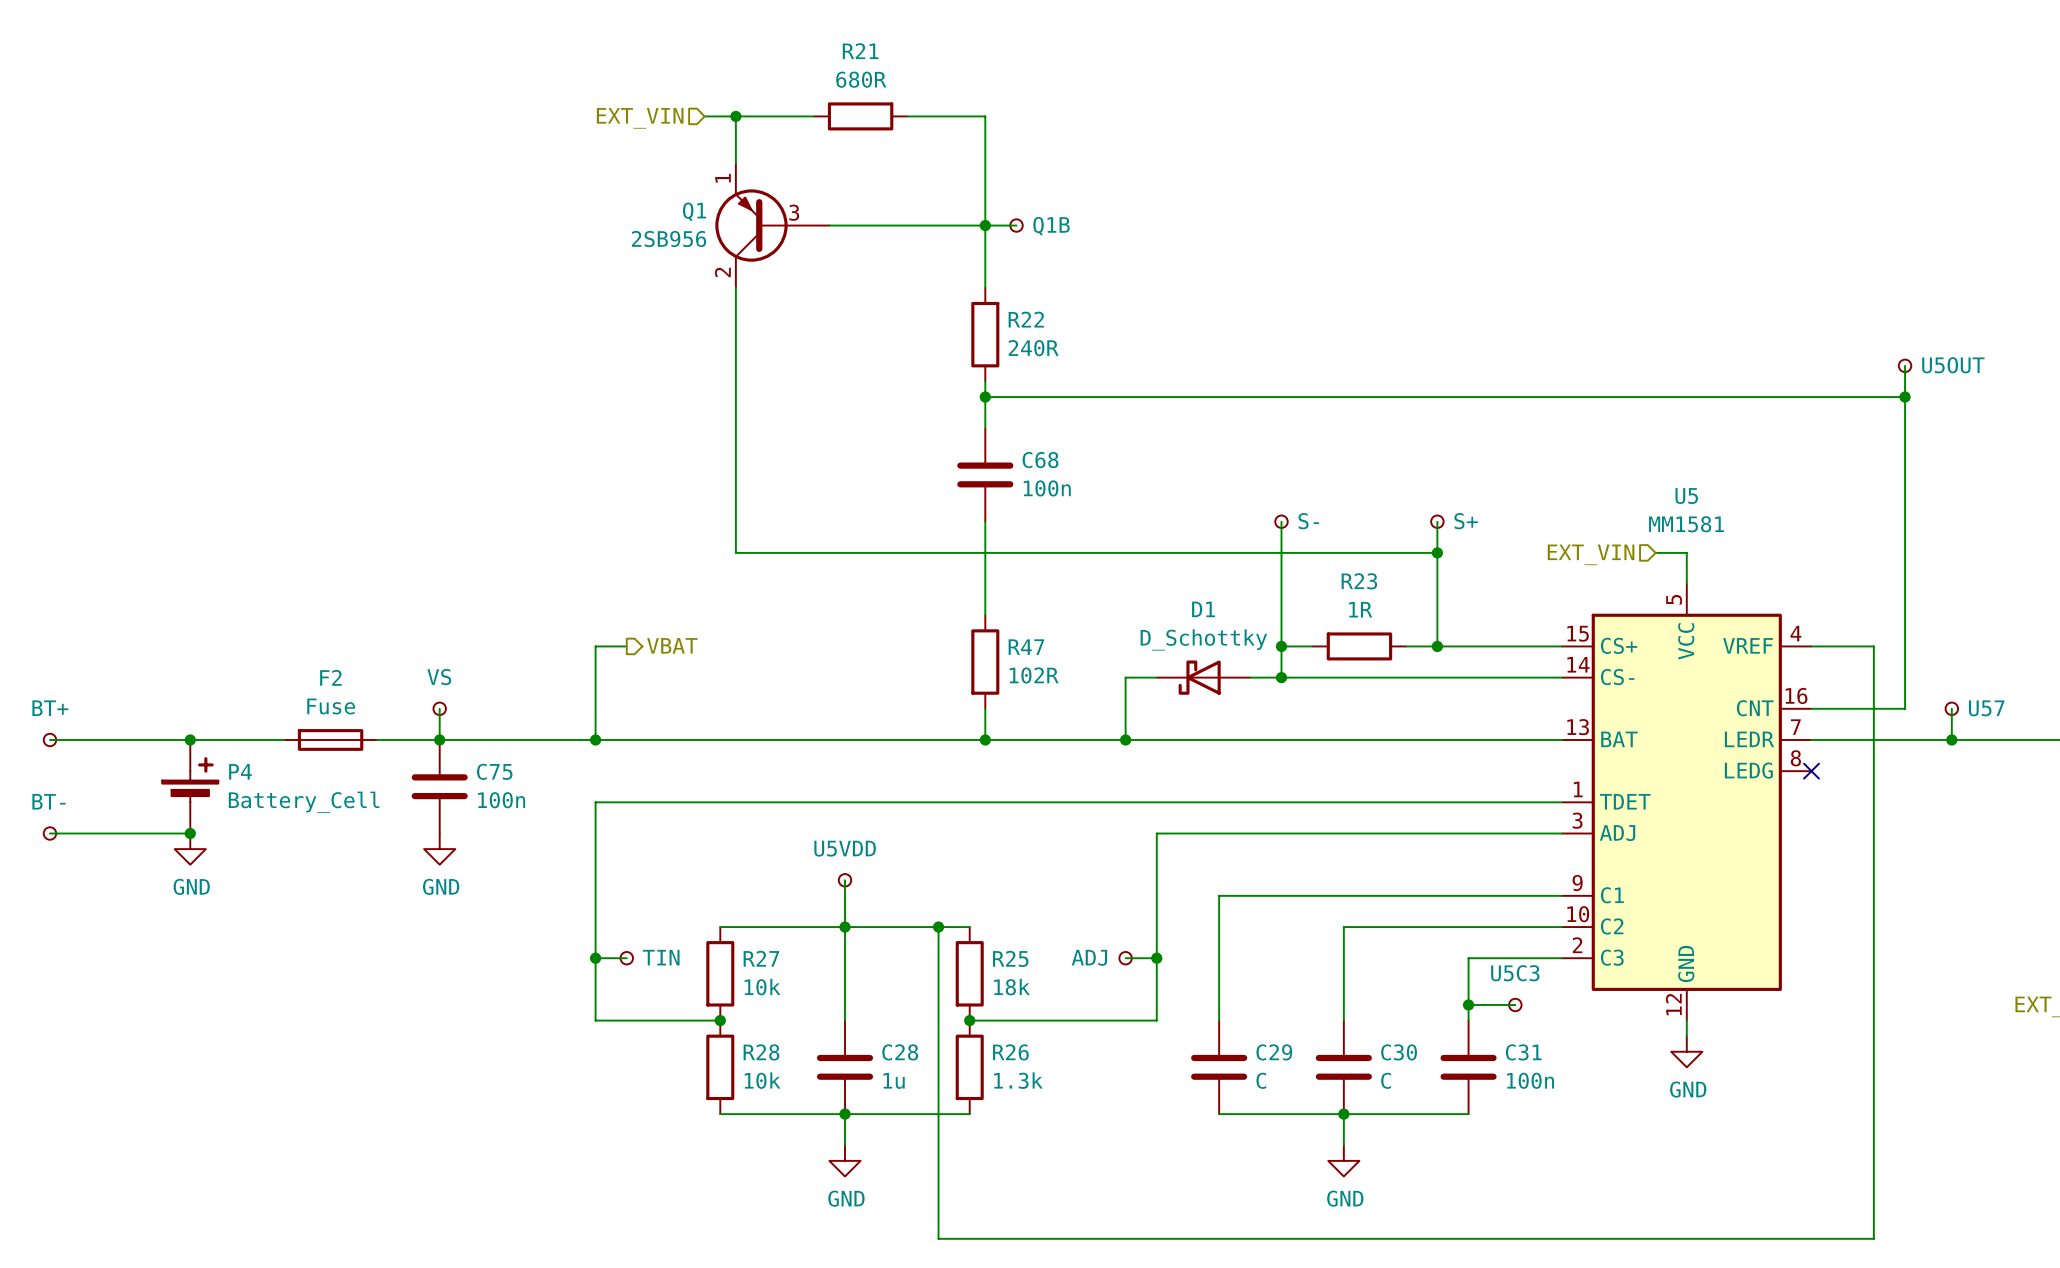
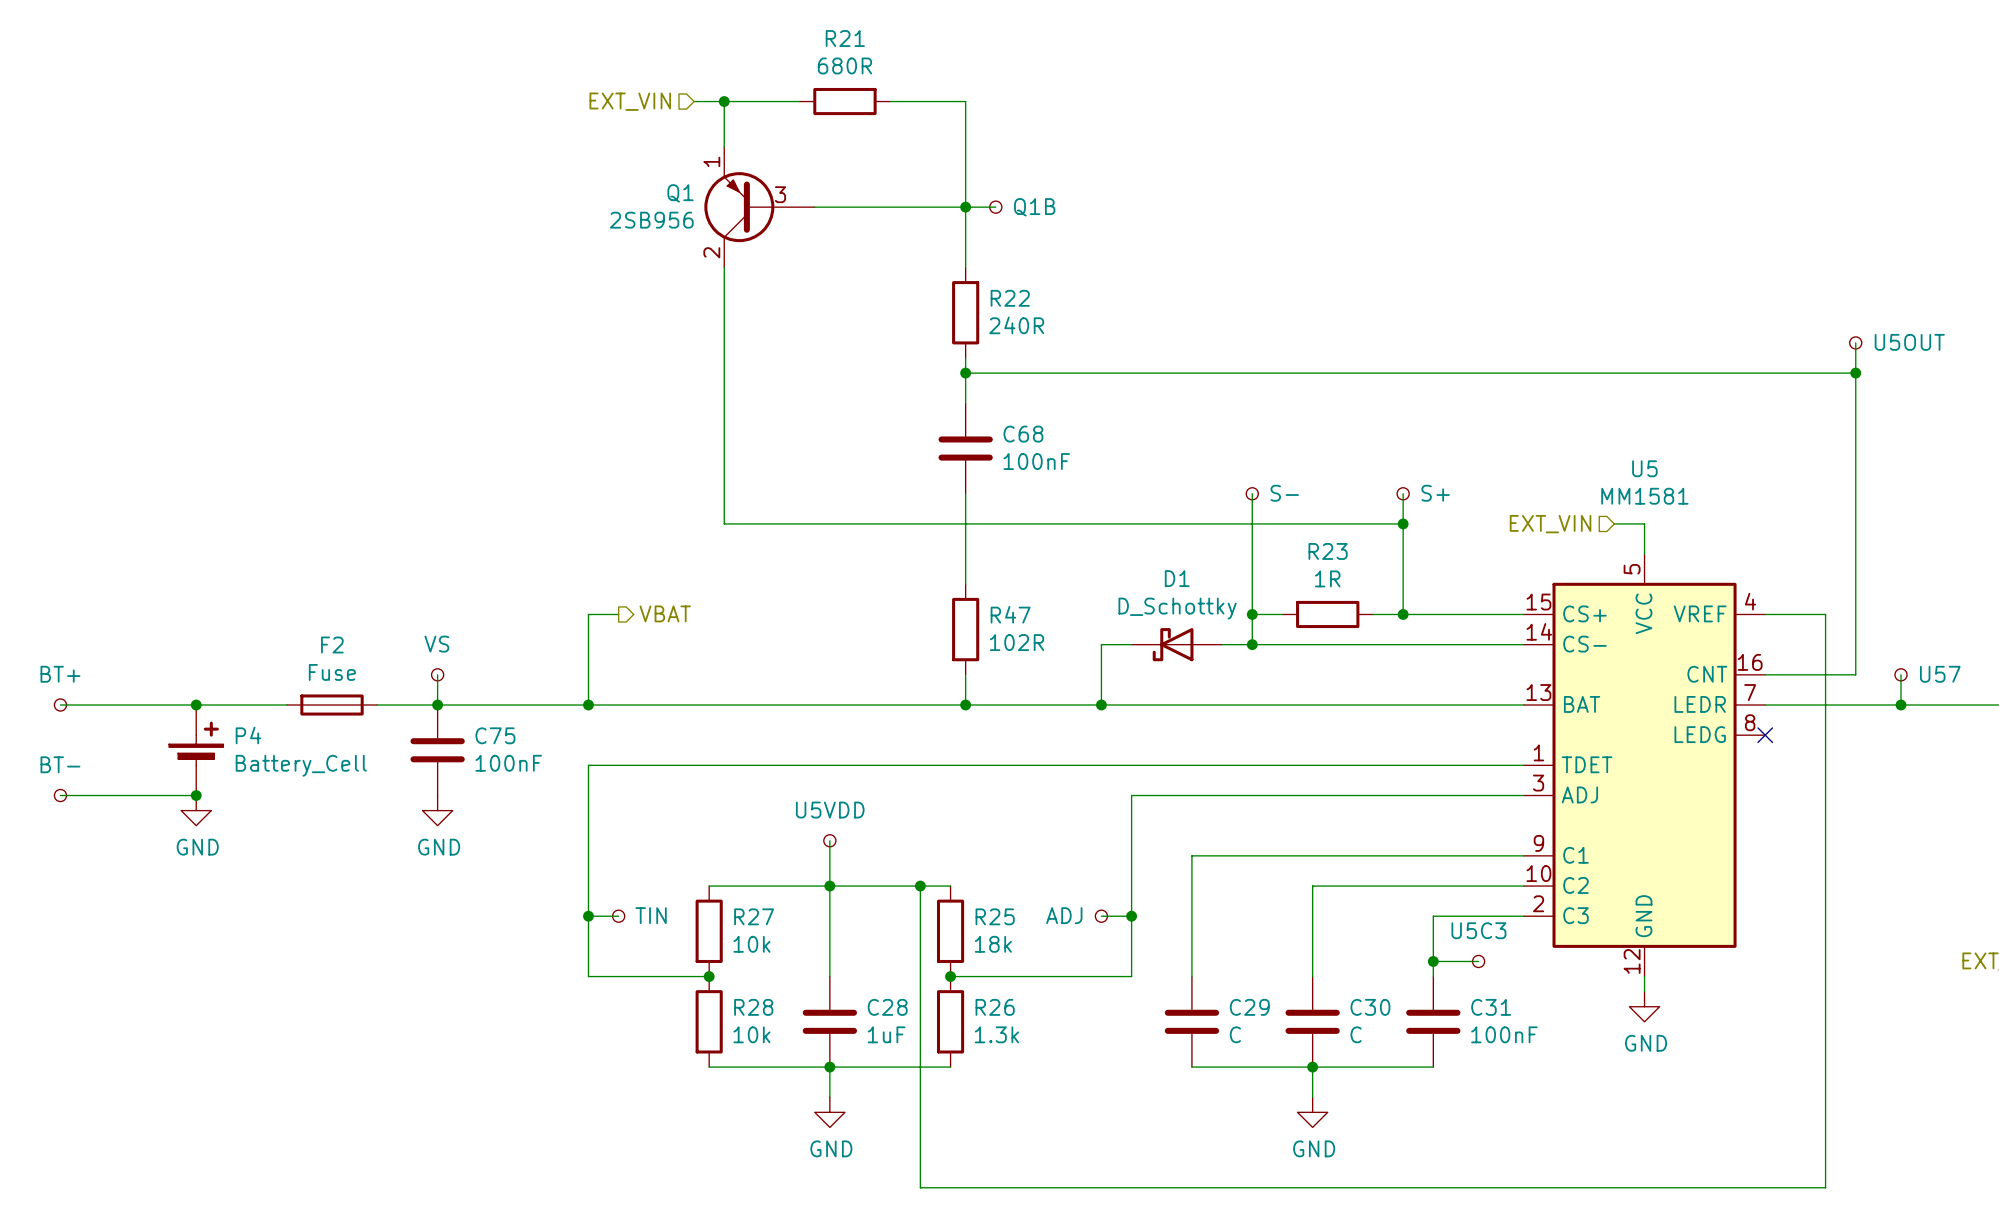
C68 value: 100n (1047, 488) -> 100nF (1036, 461)
C75 value: 100n (501, 800) -> 100nF (508, 763)
C28 value: 1u (894, 1080) -> 1uF (886, 1034)
C31 value: 100n (1530, 1080) -> 100nF (1504, 1034)

